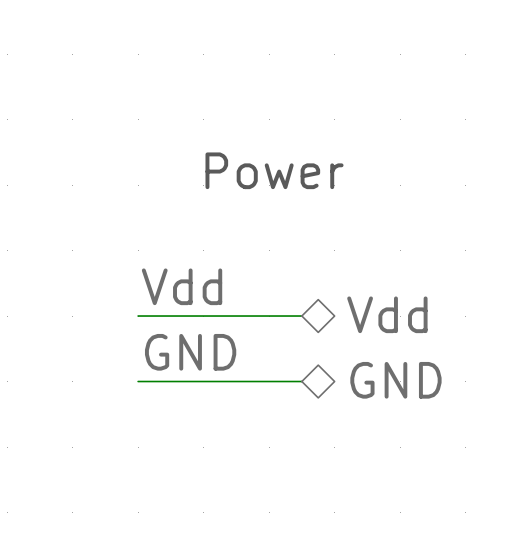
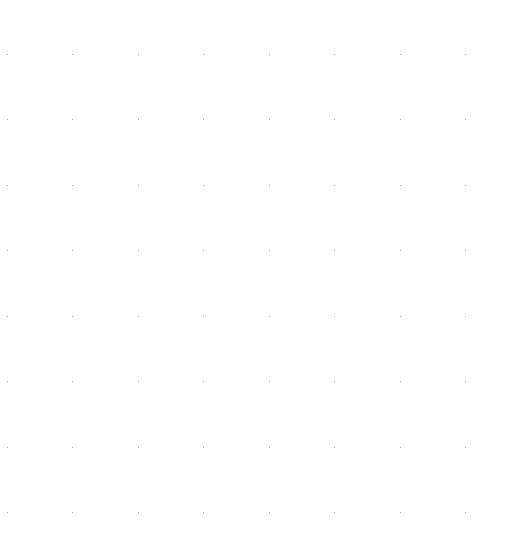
text: Power (274, 170) -> none
label: Vdd (182, 286) -> none
hierarchical label: Vdd (387, 314) -> none
wire: (138, 316) (301, 316) -> none
label: GND (190, 352) -> none
hierarchical label: GND (395, 380) -> none
wire: (138, 381) (301, 381) -> none

